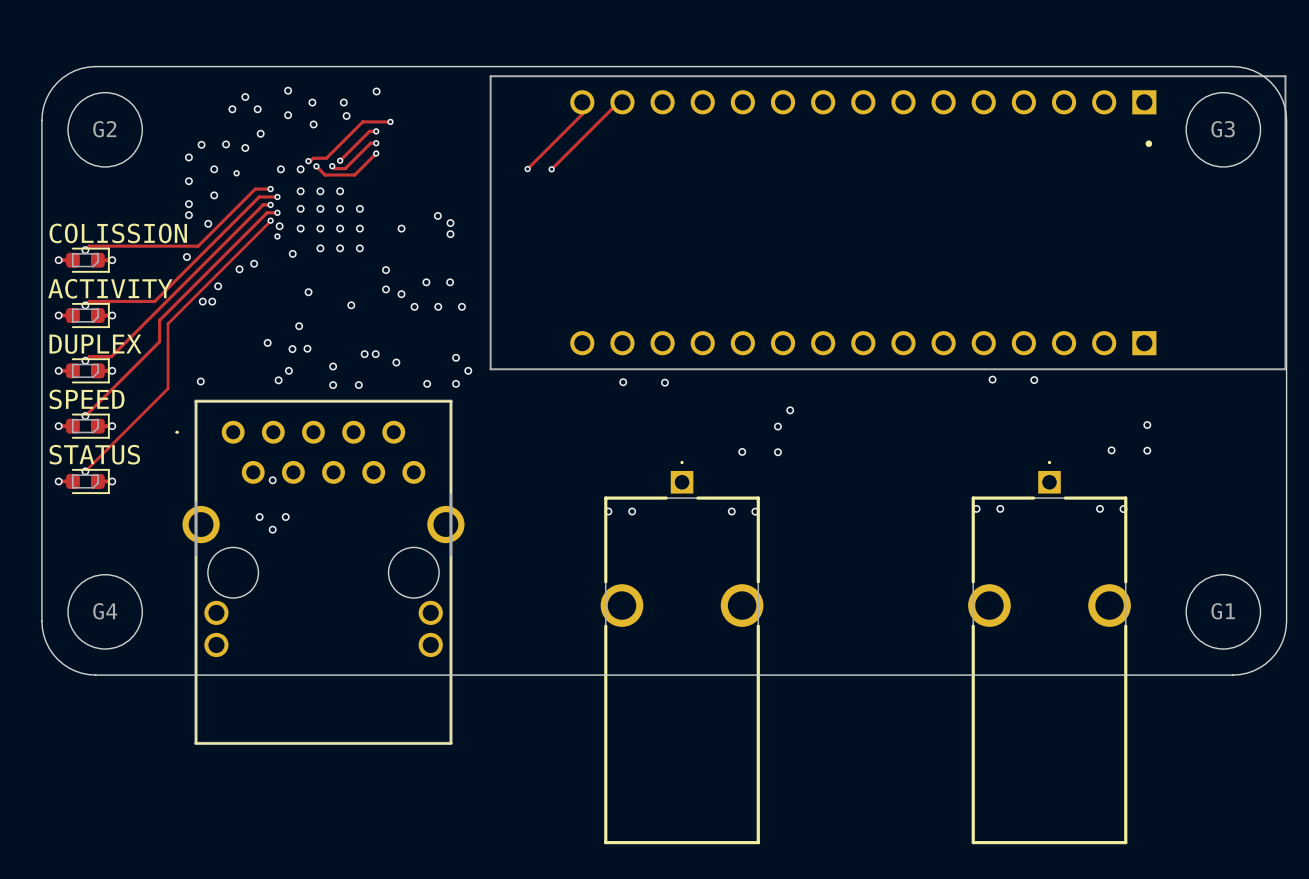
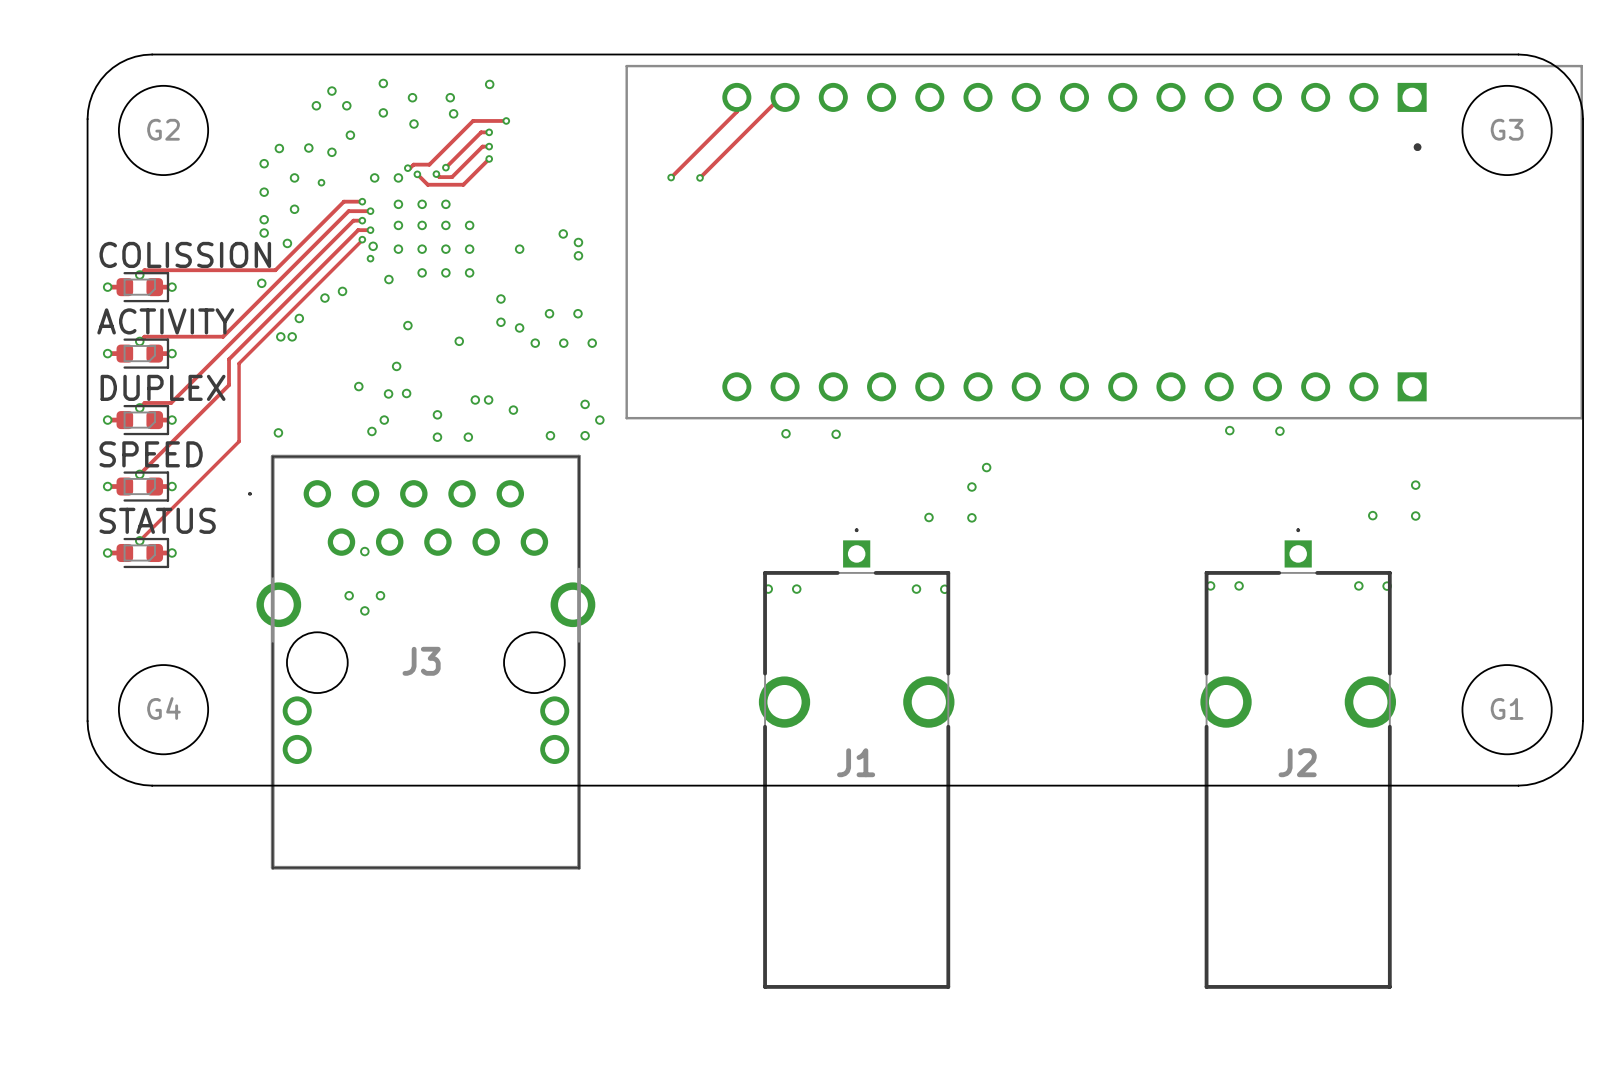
J3 name: none -> J3 (421, 661)
J1 name: none -> J1 (856, 762)
J2 name: none -> J2 (1297, 762)

